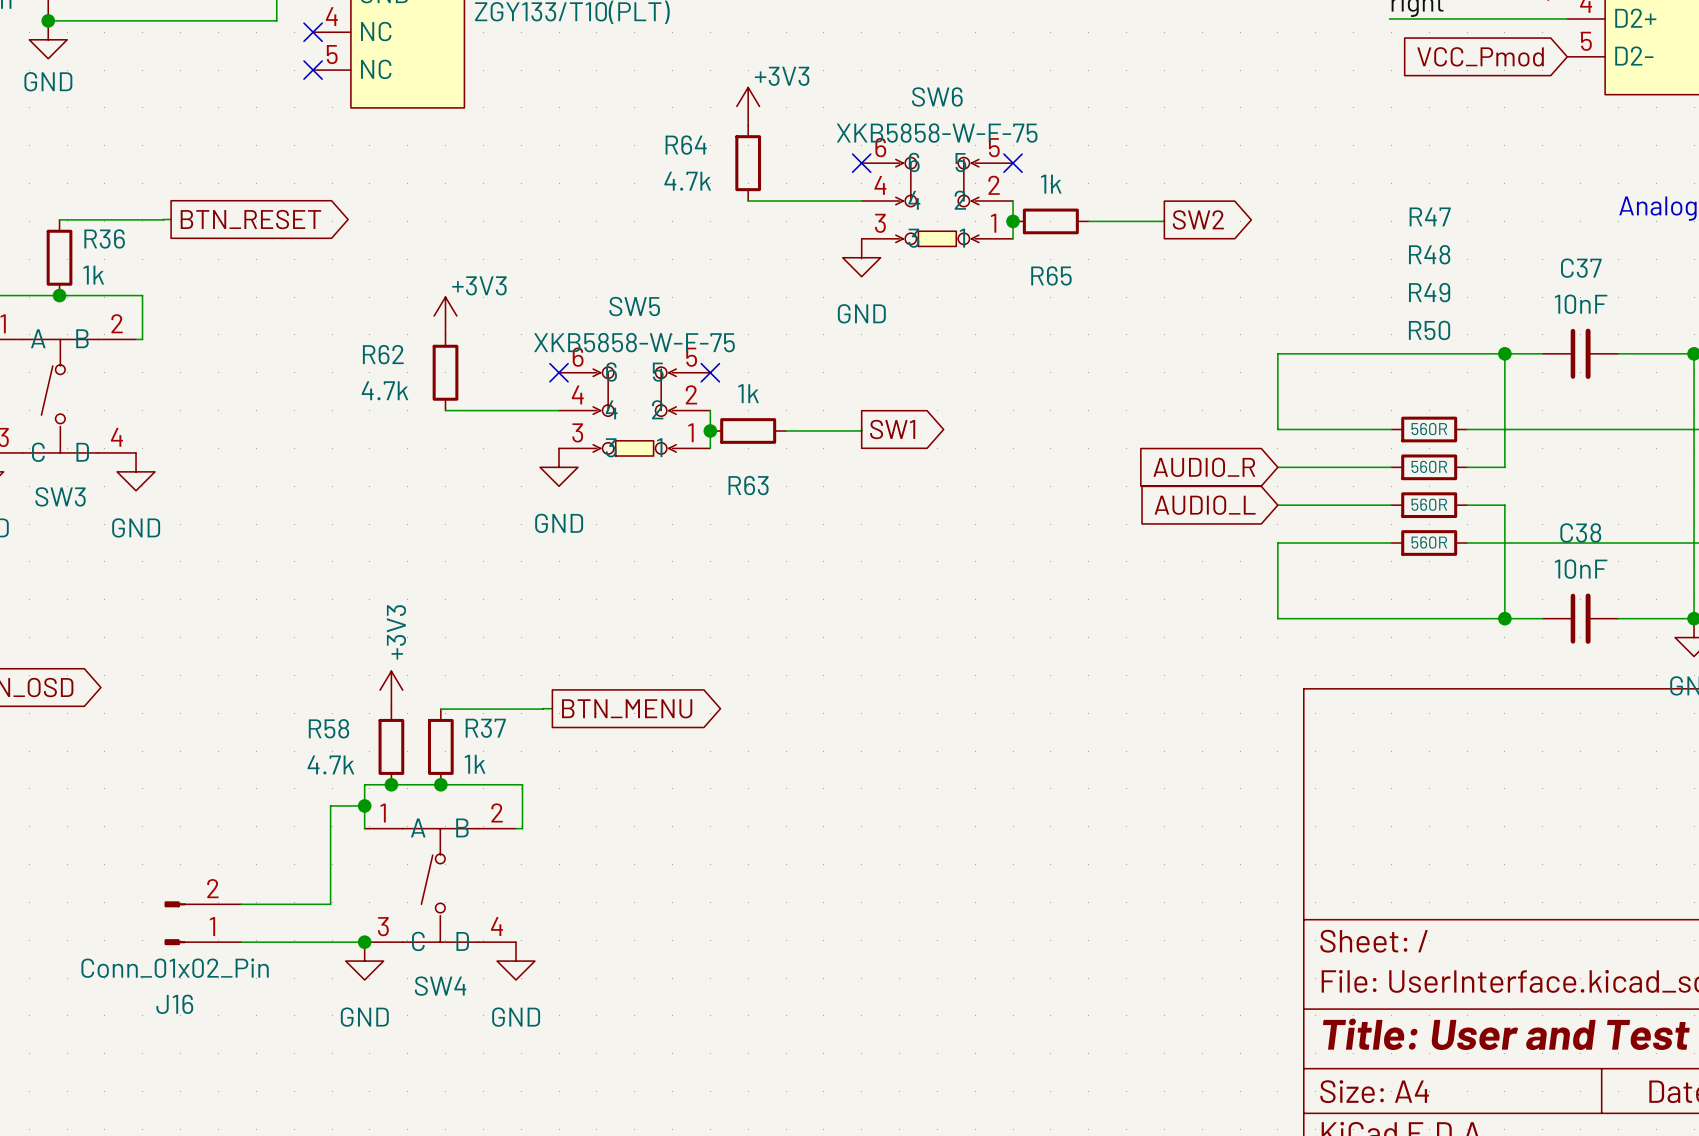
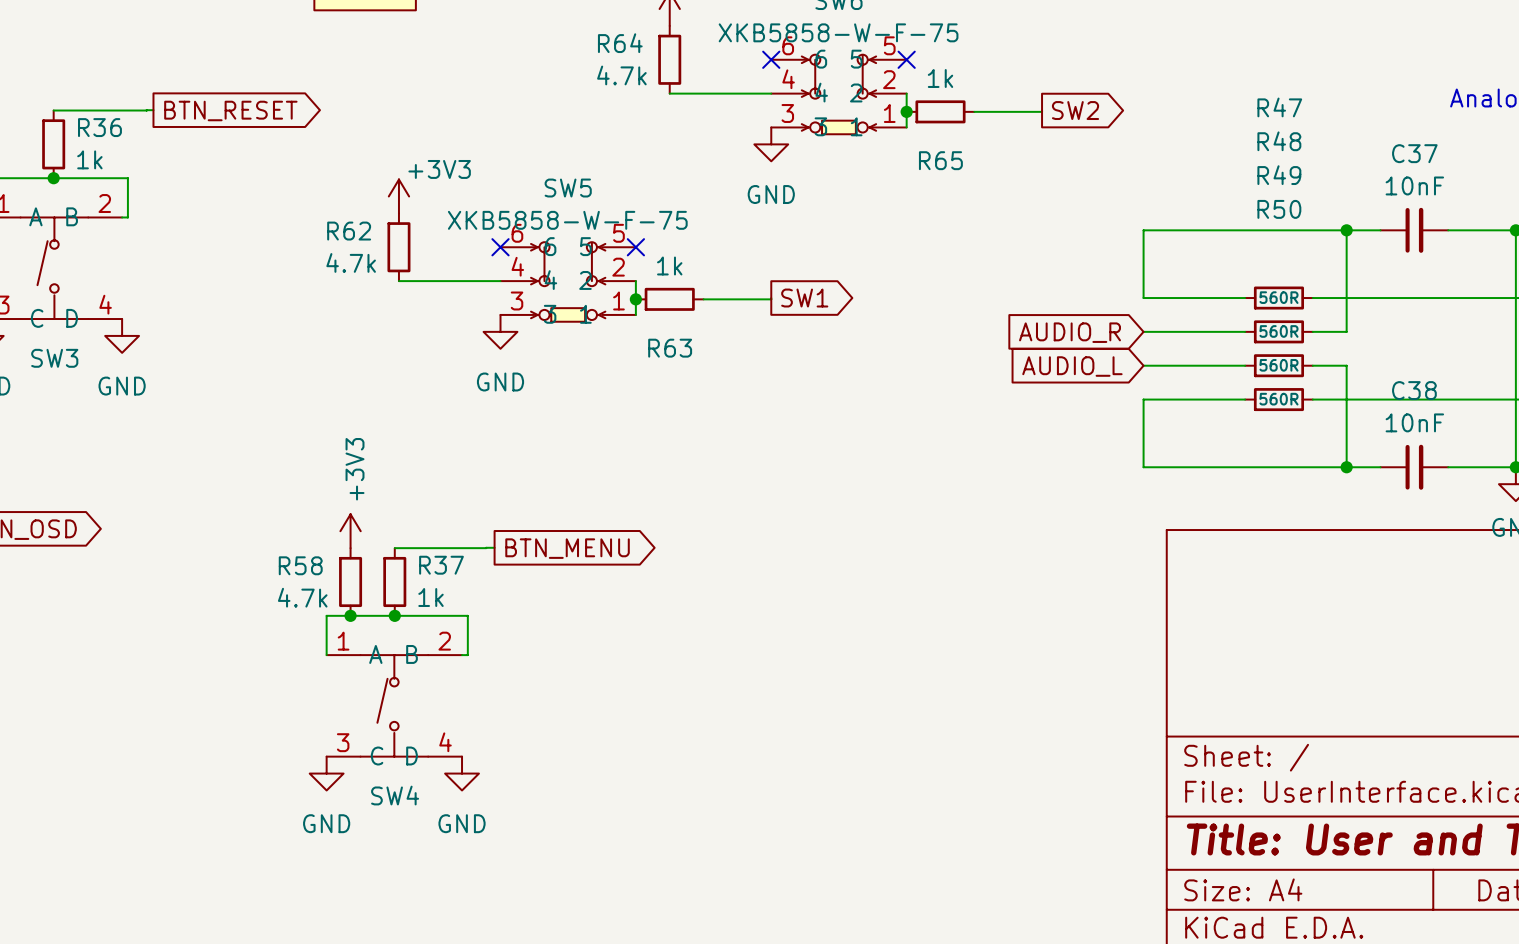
wire: (364, 805) (330, 805) (330, 904) (241, 904) -> none
junction: (364, 805) -> none
J16: Conn_01x02_Pin (202, 923) -> none
wire: (241, 942) (364, 942) -> none
junction: (364, 942) -> none

